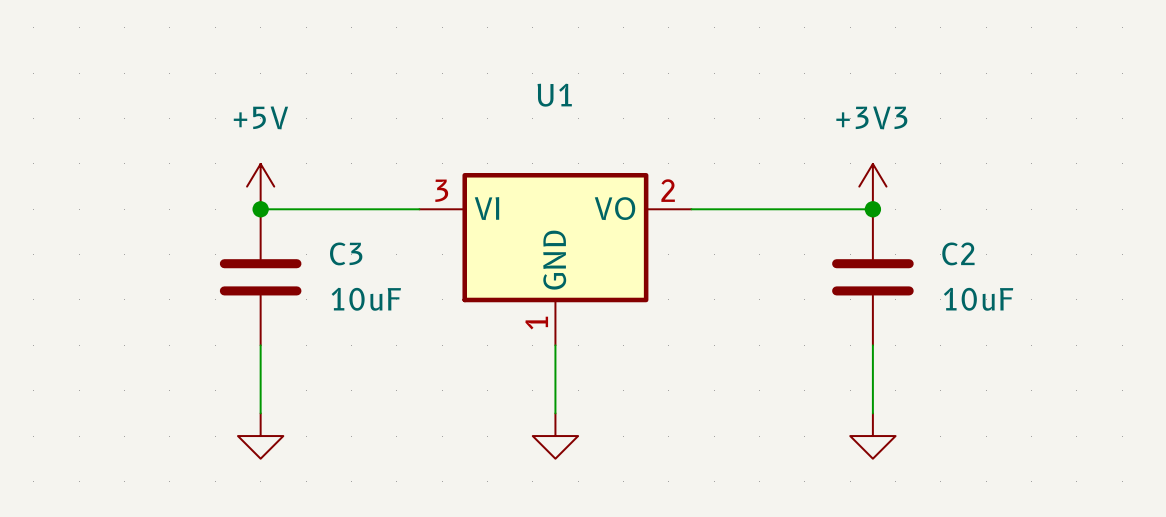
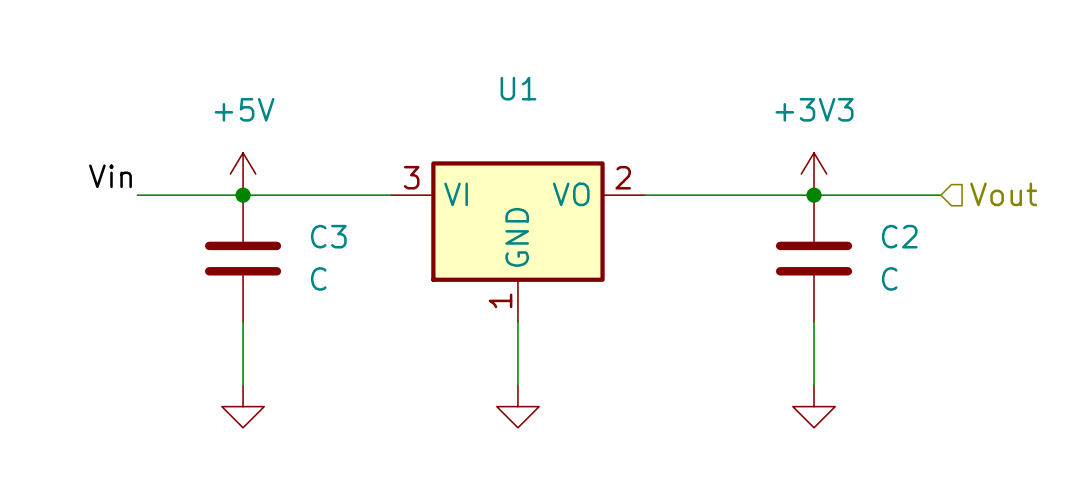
label: none -> Vin (110, 176)
hierarchical label: none -> Vout (1003, 194)
wire: none -> (137, 195) (243, 195)
wire: none -> (814, 195) (940, 195)
C3 value: 10uF (366, 299) -> C (318, 278)
C2 value: 10uF (978, 299) -> C (889, 278)

